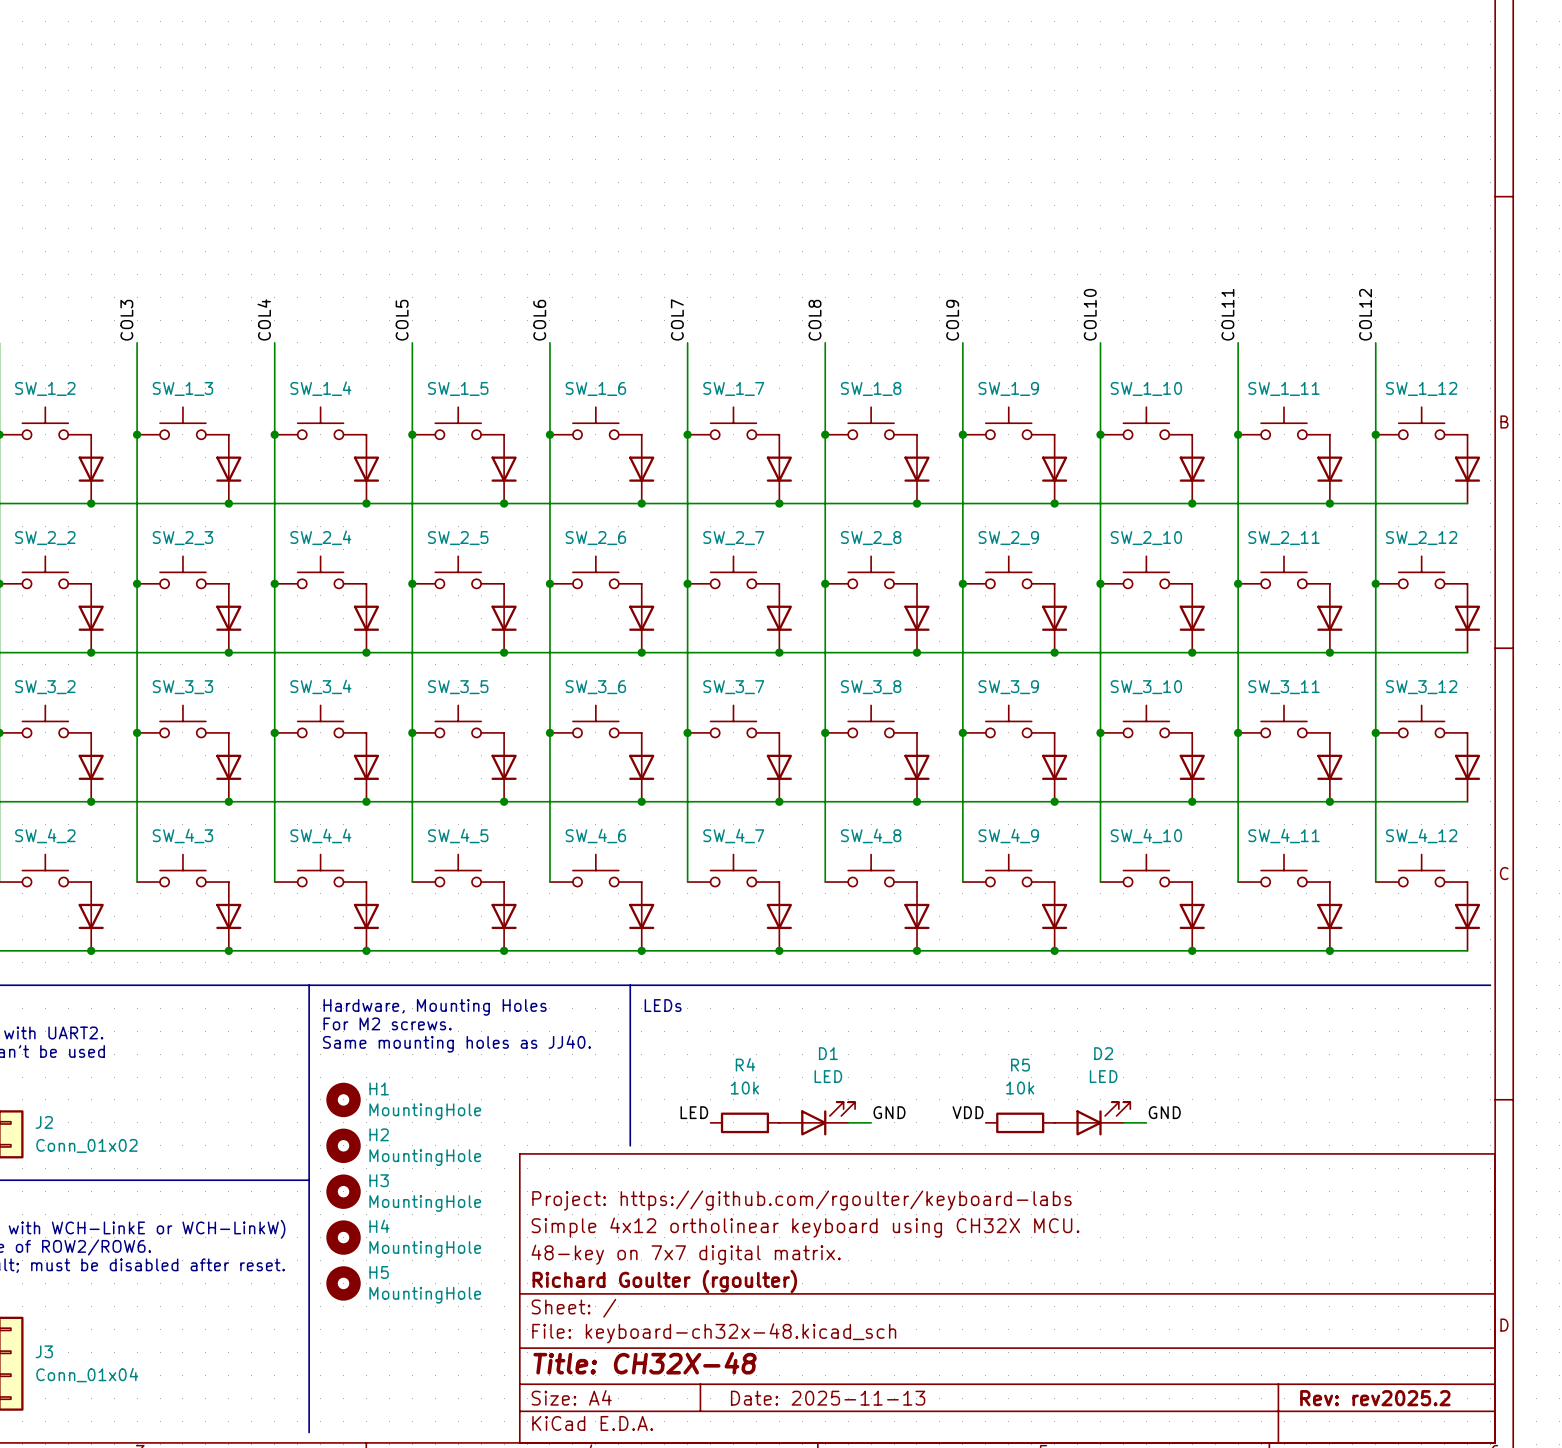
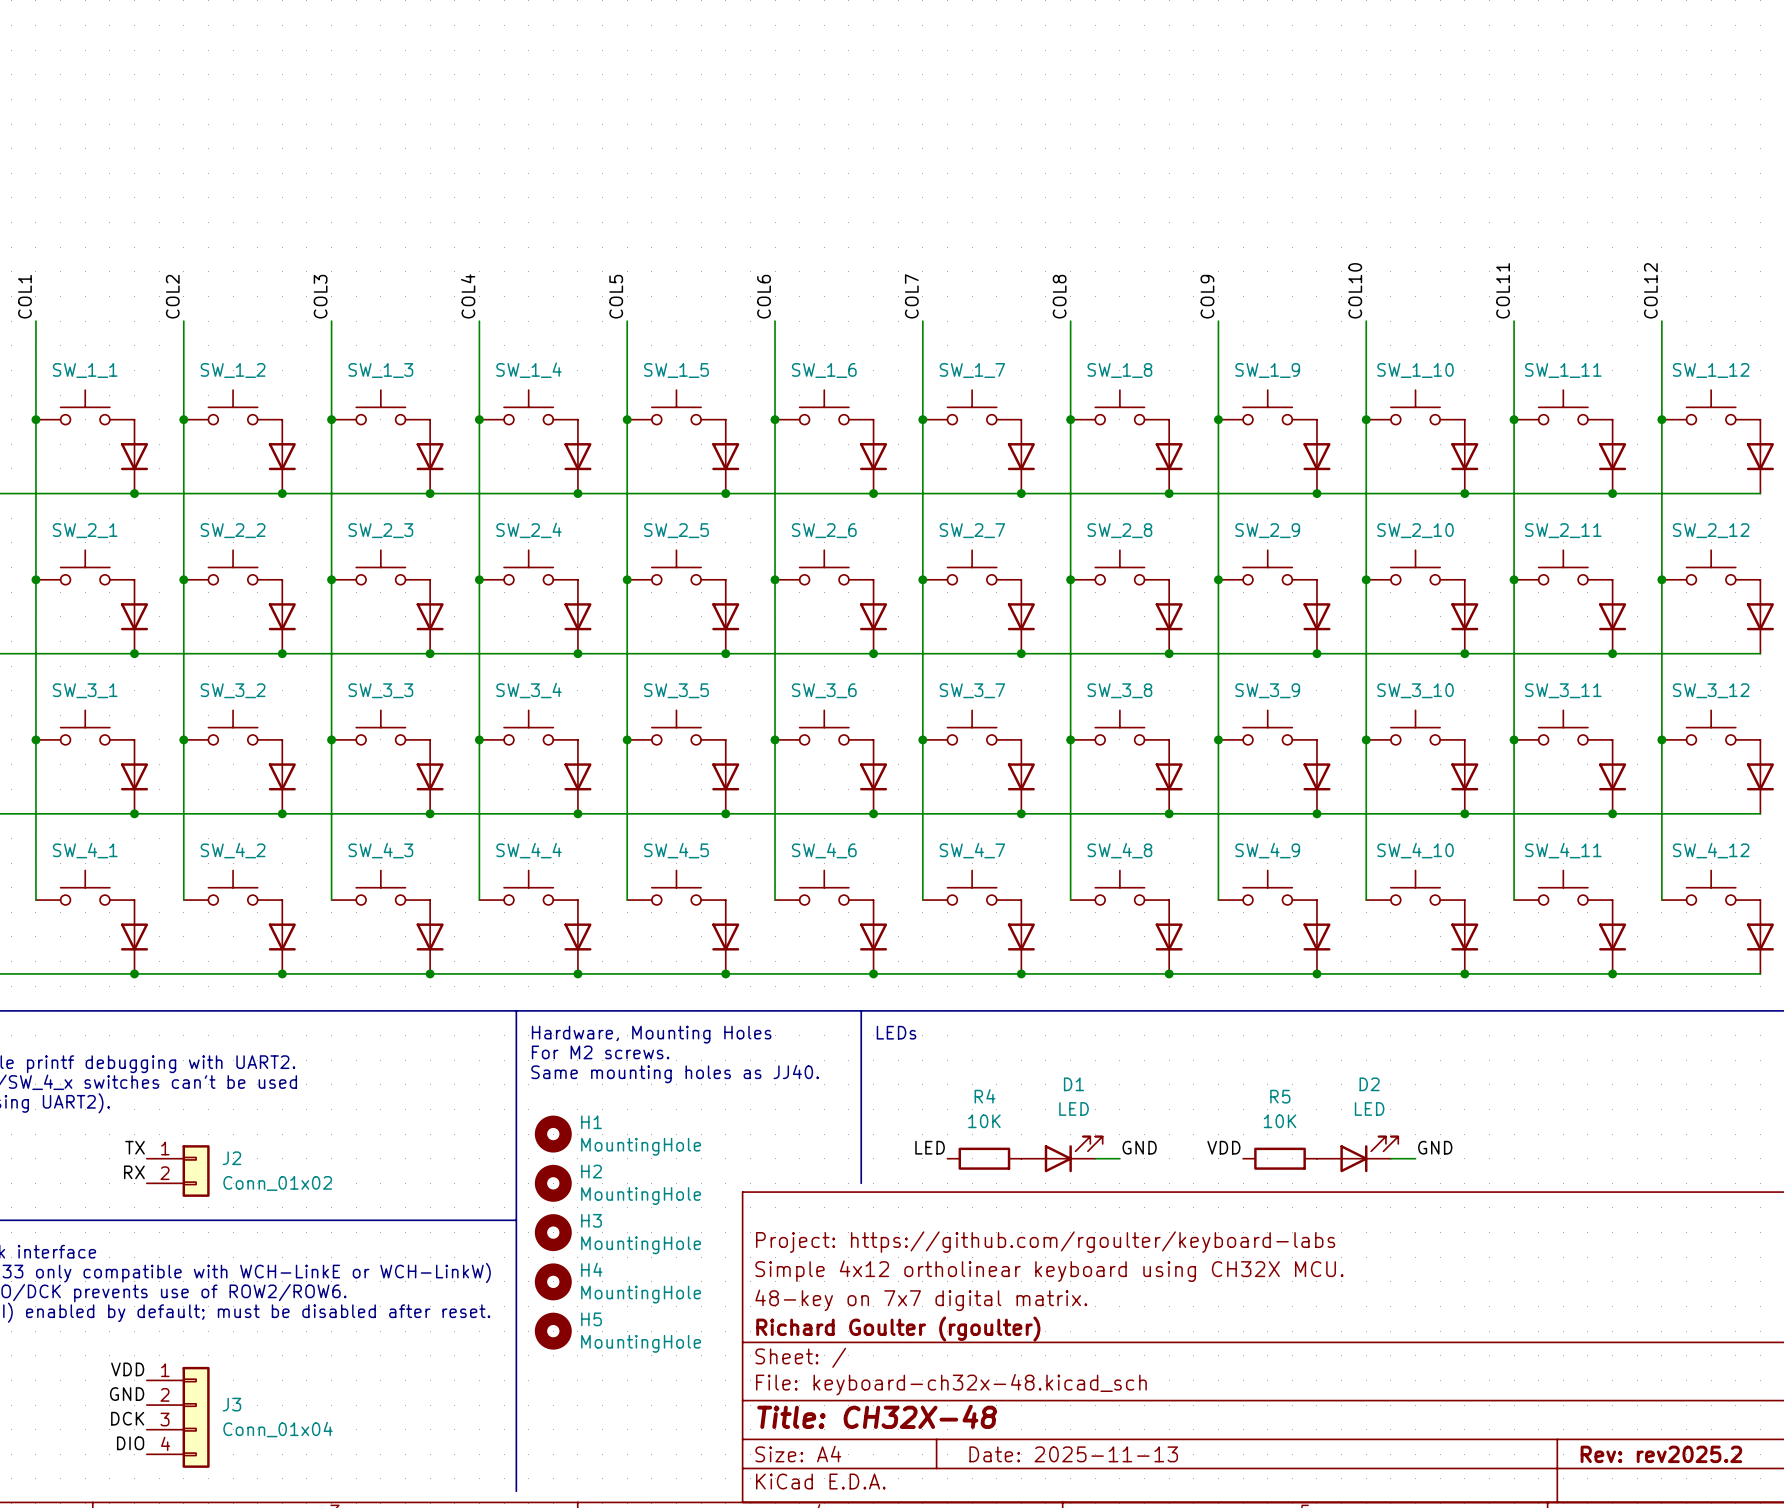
R4 value: 10k (744, 1088) -> 10K (984, 1121)
R5 value: 10k (1020, 1088) -> 10K (1280, 1121)

